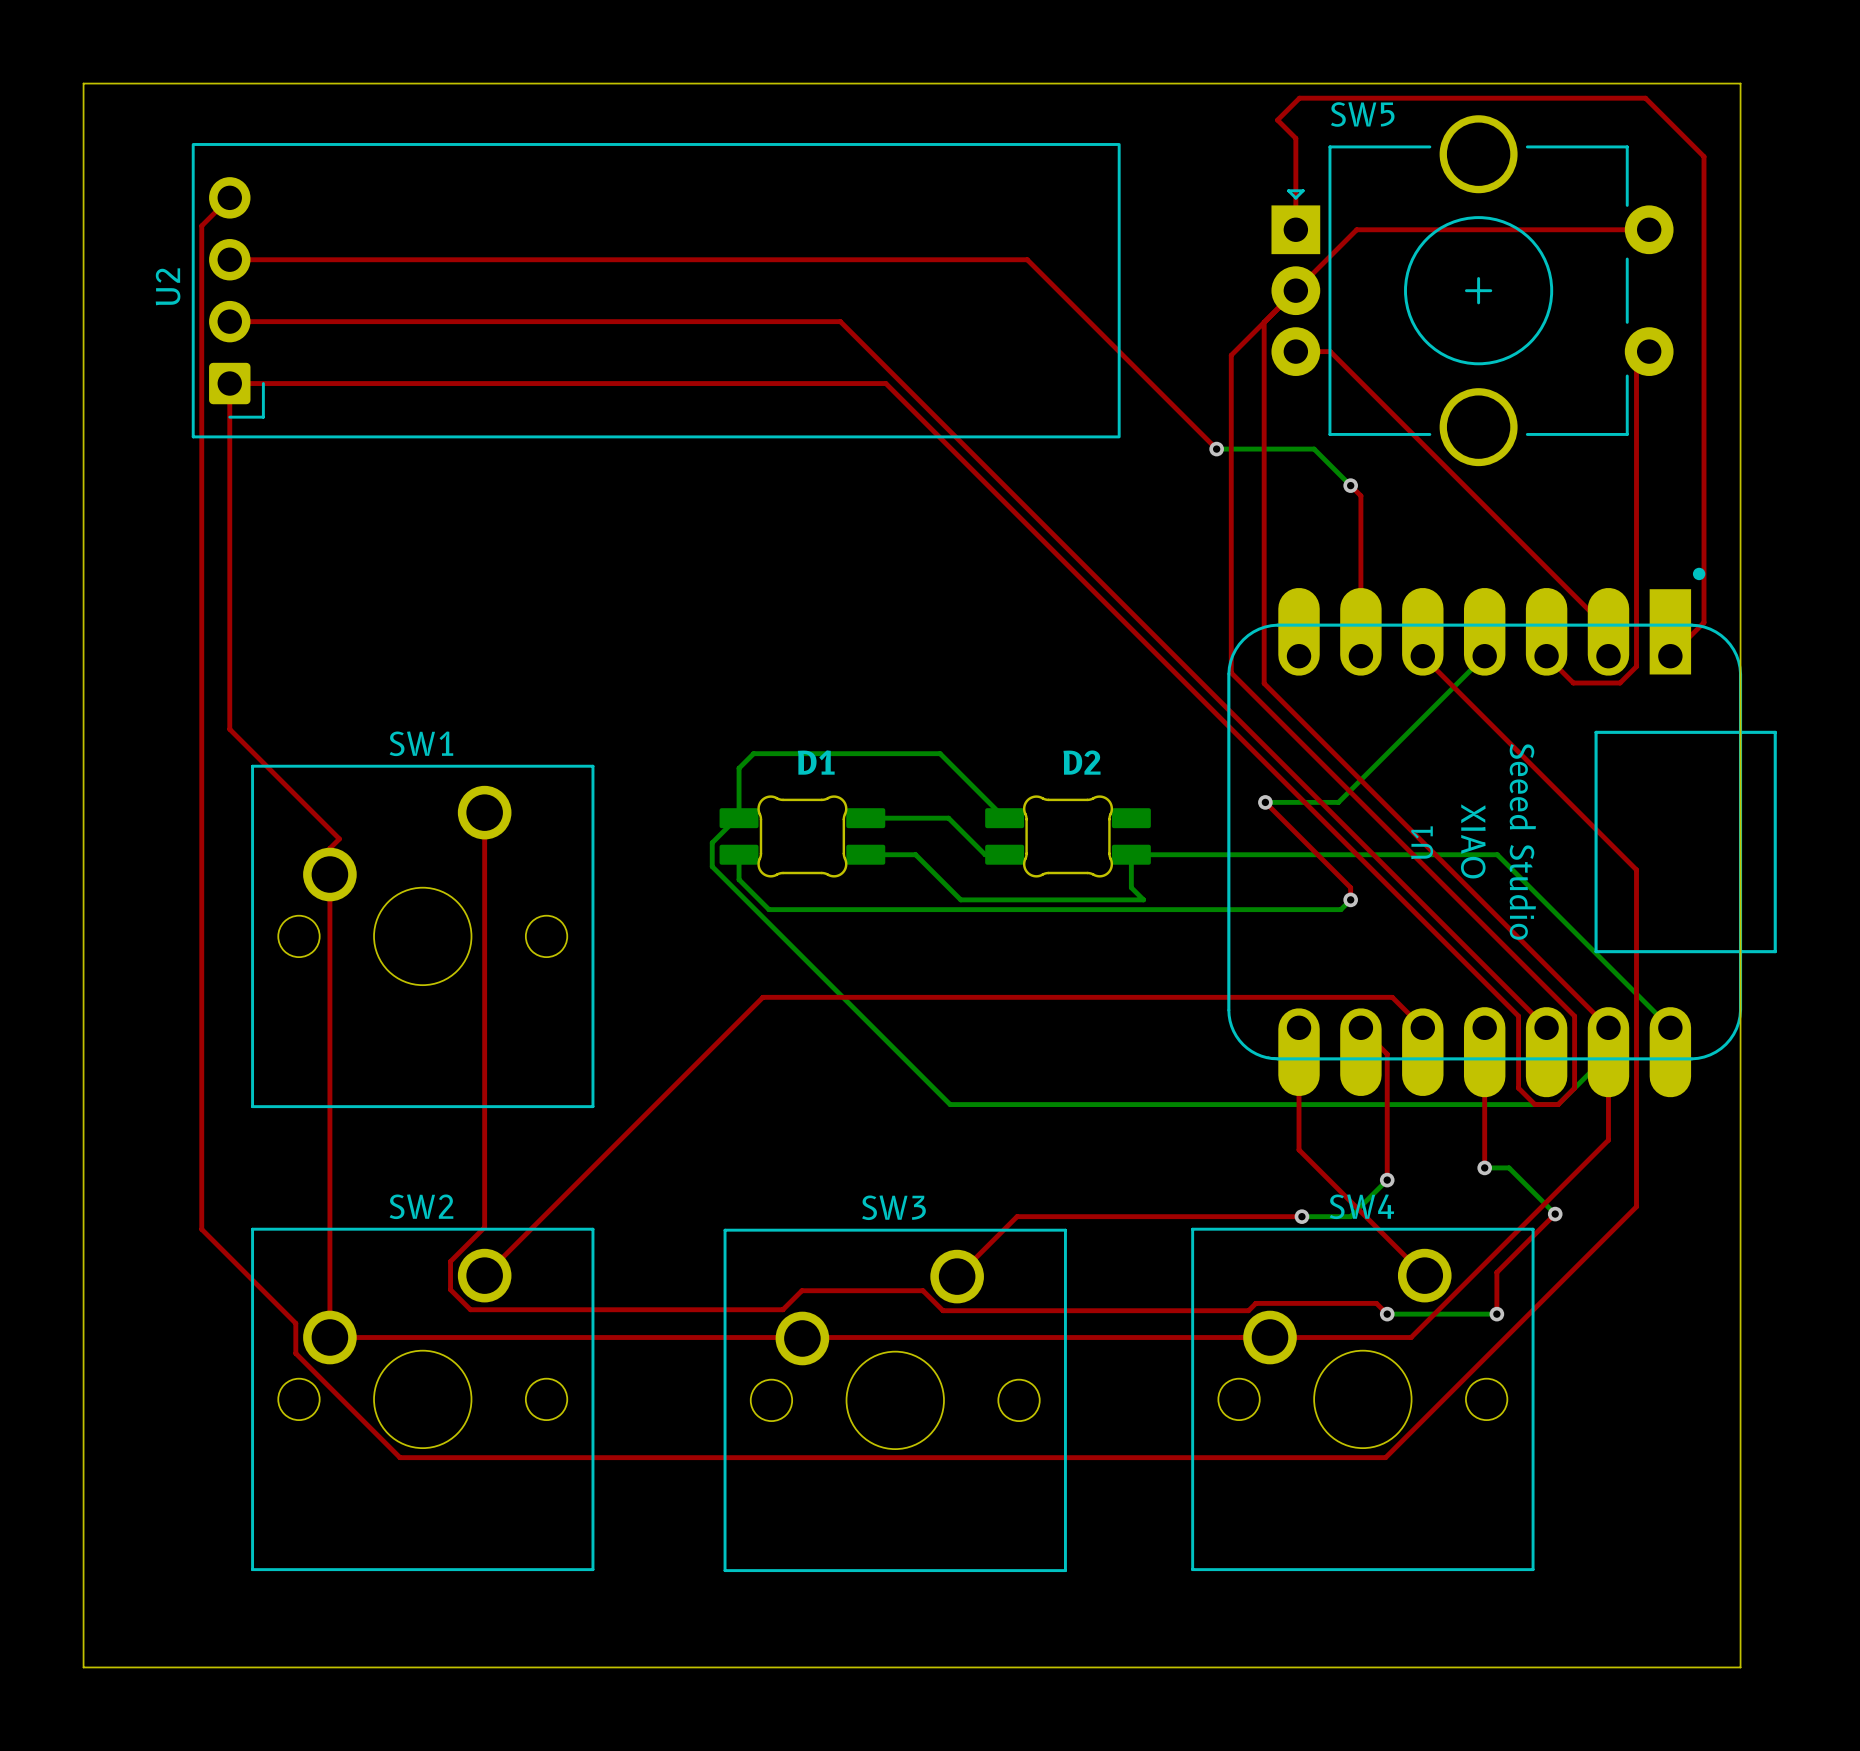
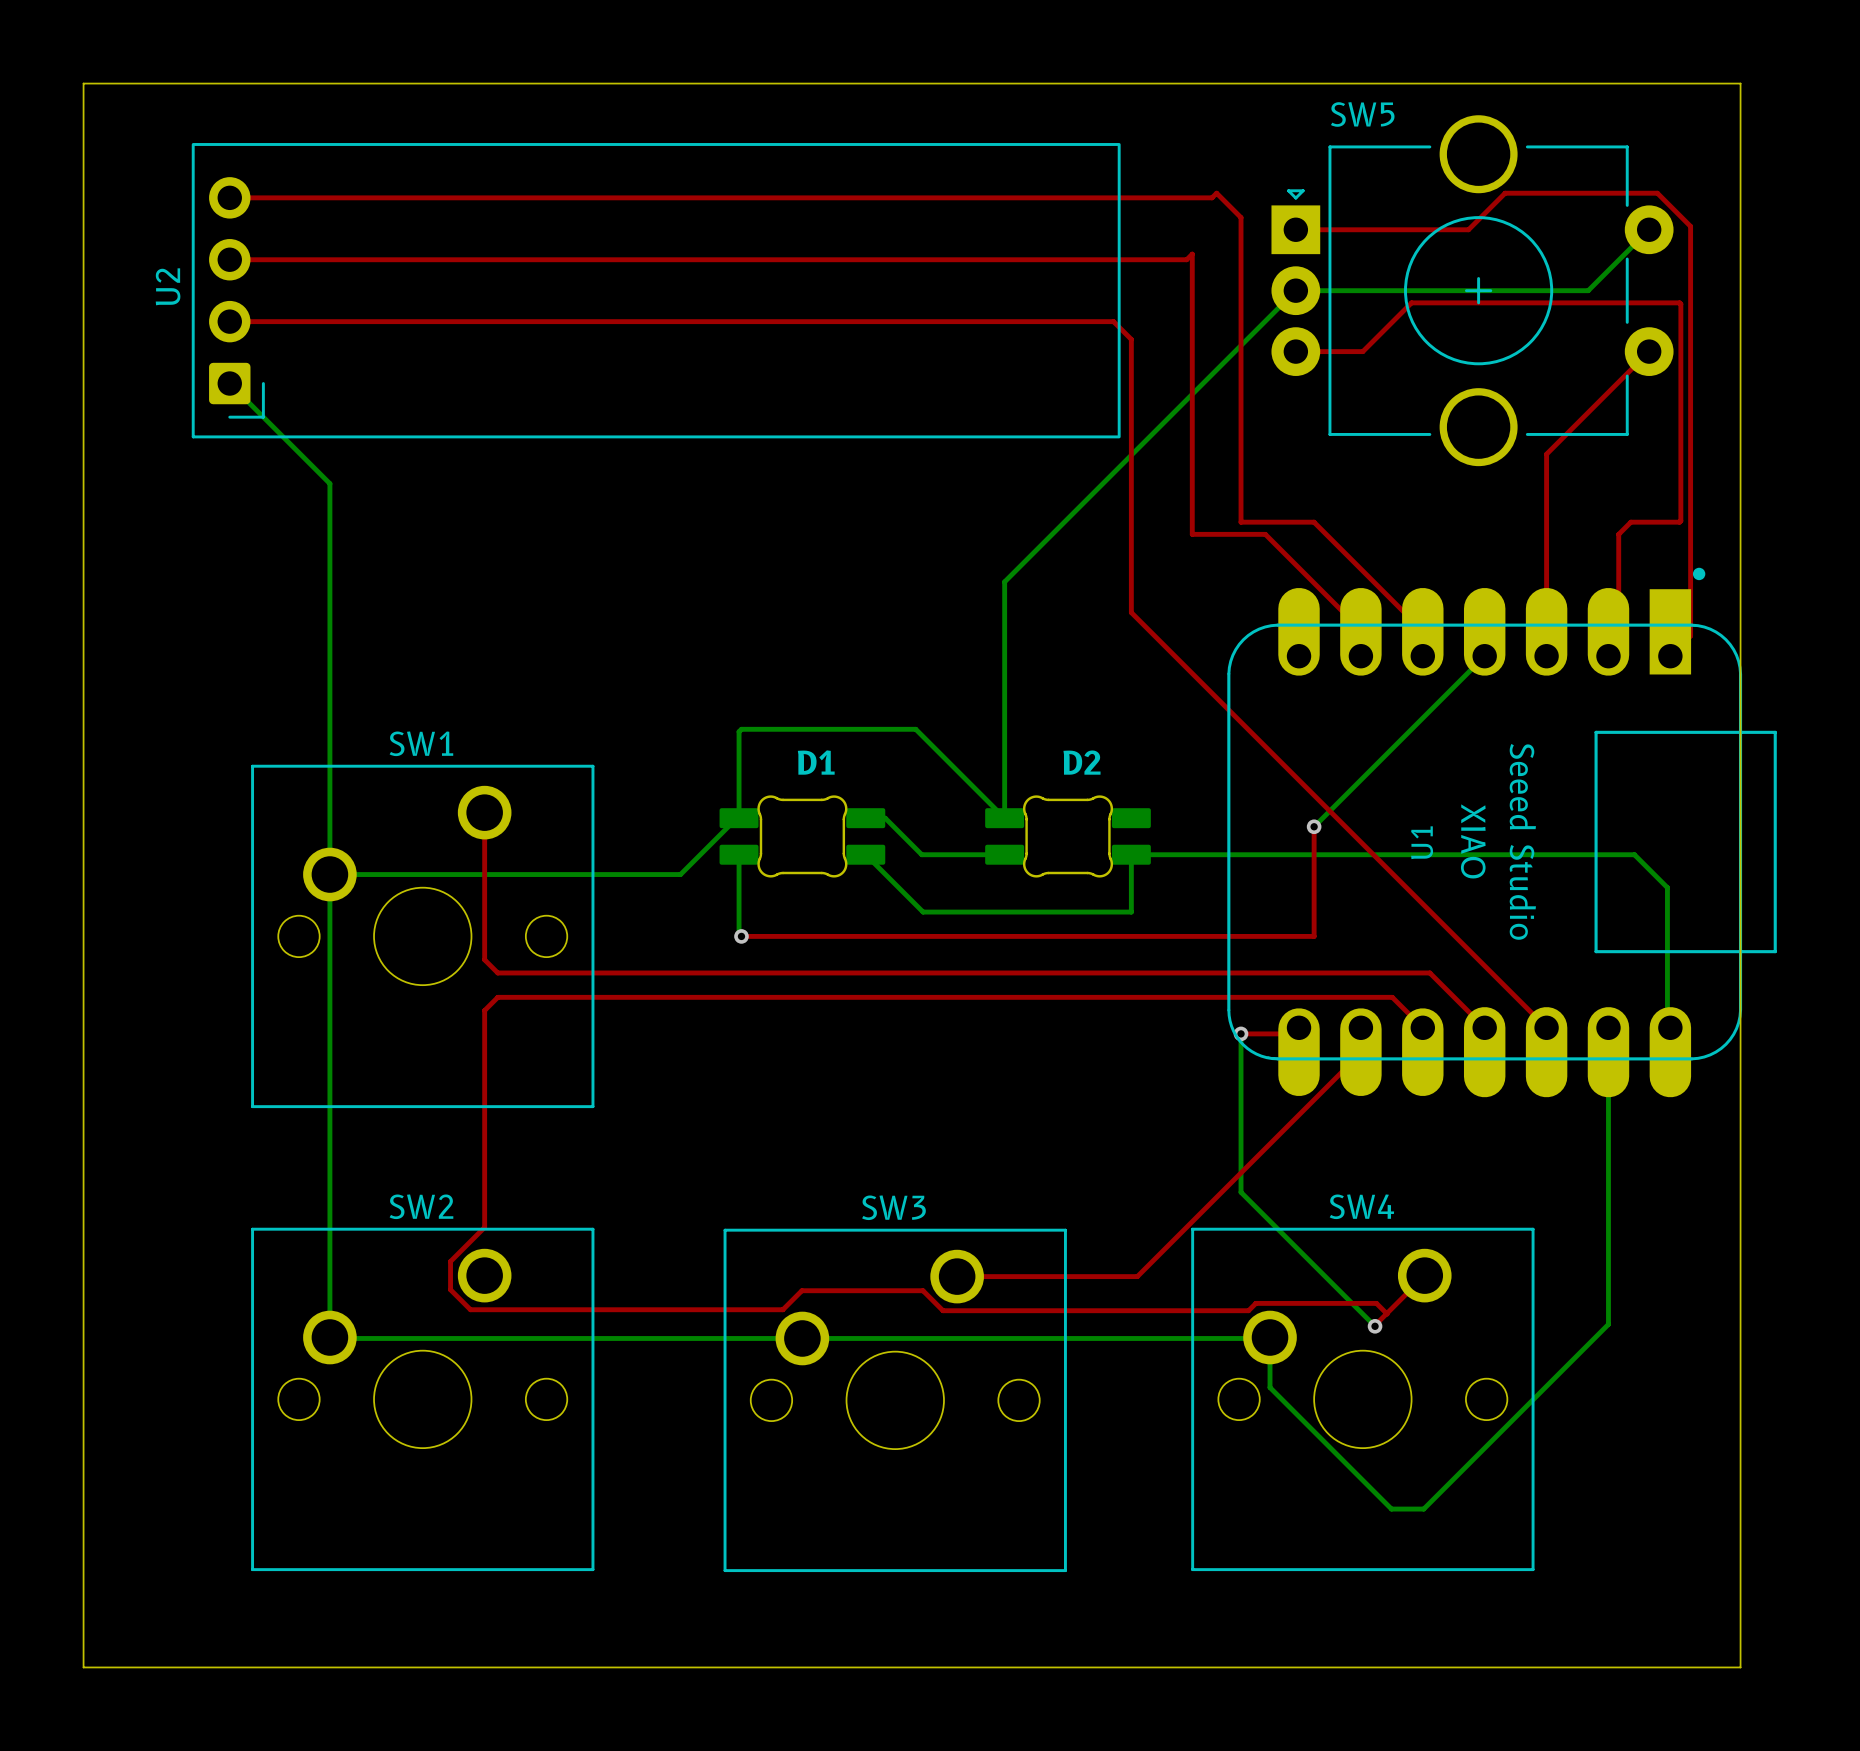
top track: (229, 197) (201, 225) (201, 1229) (295, 1323) (295, 1353) (400, 1457) (1385, 1457) (1636, 1206) (1636, 869) (1422, 656) -> (229, 197) (1212, 197) (1216, 193) (1241, 217) (1241, 522) (1314, 522) (1422, 630) (1422, 656)
top track: (1295, 229) (1295, 138) (1277, 120) (1299, 98) (1645, 98) (1704, 156) (1704, 622) (1690, 635) -> (1468, 229) (1505, 193) (1657, 193) (1690, 226) (1690, 635)
top track: (1356, 229) (1231, 355) (1231, 672) (1574, 1016) (1574, 1088) (1558, 1104) (1534, 1104) (1518, 1088) (1518, 1016) (885, 383) (229, 383) (229, 729) (339, 838) (329, 848) (329, 1337) (1411, 1337) (1608, 1140) (1608, 1027) (1264, 683) (1264, 322) -> (1356, 229) (1295, 229)
top track: (1468, 229) (1649, 229) -> none
bottom track: none -> (1649, 229) (1588, 290) (1295, 290) (1004, 581) (1004, 818)
top track: (1027, 259) (1216, 449) -> (1027, 259) (1186, 259) (1192, 254) (1192, 534) (1265, 534) (1360, 629)
top track: (840, 321) (1131, 612) -> (840, 321) (1113, 321) (1131, 339) (1131, 612)
top track: (1330, 351) (1608, 629) (1608, 656) -> (1330, 351) (1362, 351) (1411, 302) (1680, 304) (1680, 520) (1630, 522) (1618, 534) (1618, 645) (1608, 656)
top track: (1636, 364) (1636, 666) (1620, 683) (1573, 683) (1546, 656) -> (1636, 364) (1546, 454) (1546, 656)
bottom track: (1216, 449) (1314, 449) (1350, 485) -> none
via: (1216, 449) -> none
top track: (1350, 485) (1360, 495) (1360, 629) -> none
via: (1350, 485) -> none
bottom track: (940, 753) (753, 753) (739, 768) -> (940, 753) (915, 729) (741, 729) (739, 731) (739, 768)
top track: (1265, 802) (1350, 887) (1350, 899) -> none
bottom track: (1265, 802) (1338, 802) -> (1314, 826) (1338, 802)
via: (1265, 802) -> none
bottom track: (885, 818) (948, 818) (985, 854) -> (885, 818) (921, 854) (985, 854)
top track: none -> (1314, 826) (1314, 936) (741, 936)
via: none -> (1314, 826)
bottom track: (712, 842) (712, 866) (950, 1104) (1558, 1104) (1608, 1054) -> (229, 383) (329, 483) (330, 1338) (1270, 1337) (1270, 1387) (1391, 1509) (1423, 1509) (1608, 1324) (1608, 1054)
bottom track: none -> (712, 842) (680, 874) (329, 874)
bottom track: (865, 854) (915, 854) (960, 899) (1143, 899) (1131, 887) -> (865, 854) (923, 912) (1131, 912) (1131, 887)
bottom track: (1497, 854) (1667, 1024) -> (1497, 854) (1634, 854) (1667, 887) (1667, 1024)
bottom track: (739, 879) (769, 909) (1340, 909) (1350, 899) -> (739, 879) (739, 933) (741, 936)
via: (1350, 899) -> none
via: none -> (741, 936)
top track: (484, 959) (484, 1010) -> (484, 959) (497, 972) (1429, 972) (1484, 1027)
top track: (762, 997) (484, 1275) -> (762, 997) (497, 997) (484, 1010)
top track: (1299, 1027) (1299, 1149) (1424, 1275) -> (1299, 1027) (1292, 1033) (1241, 1033)
top track: (1360, 1027) (1387, 1054) (1387, 1180) -> none
top track: (1484, 1027) (1484, 1167) -> none
bottom track: none -> (1241, 1033) (1241, 1192) (1375, 1326)
via: none -> (1241, 1033)
bottom track: (1484, 1167) (1509, 1167) (1555, 1214) -> none
via: (1484, 1167) -> none
bottom track: (1387, 1180) (1350, 1216) (1301, 1216) -> none
via: (1387, 1180) -> none
top track: (1555, 1214) (1496, 1272) (1496, 1314) -> none
via: (1555, 1214) -> none
top track: (1301, 1216) (1017, 1216) (957, 1276) -> (1360, 1053) (1137, 1276) (957, 1276)
via: (1301, 1216) -> none
top track: none -> (1424, 1275) (1375, 1326)
bottom track: (1387, 1314) (1496, 1314) -> none
via position: (1387, 1314) -> (1375, 1326)
via: (1496, 1314) -> none

